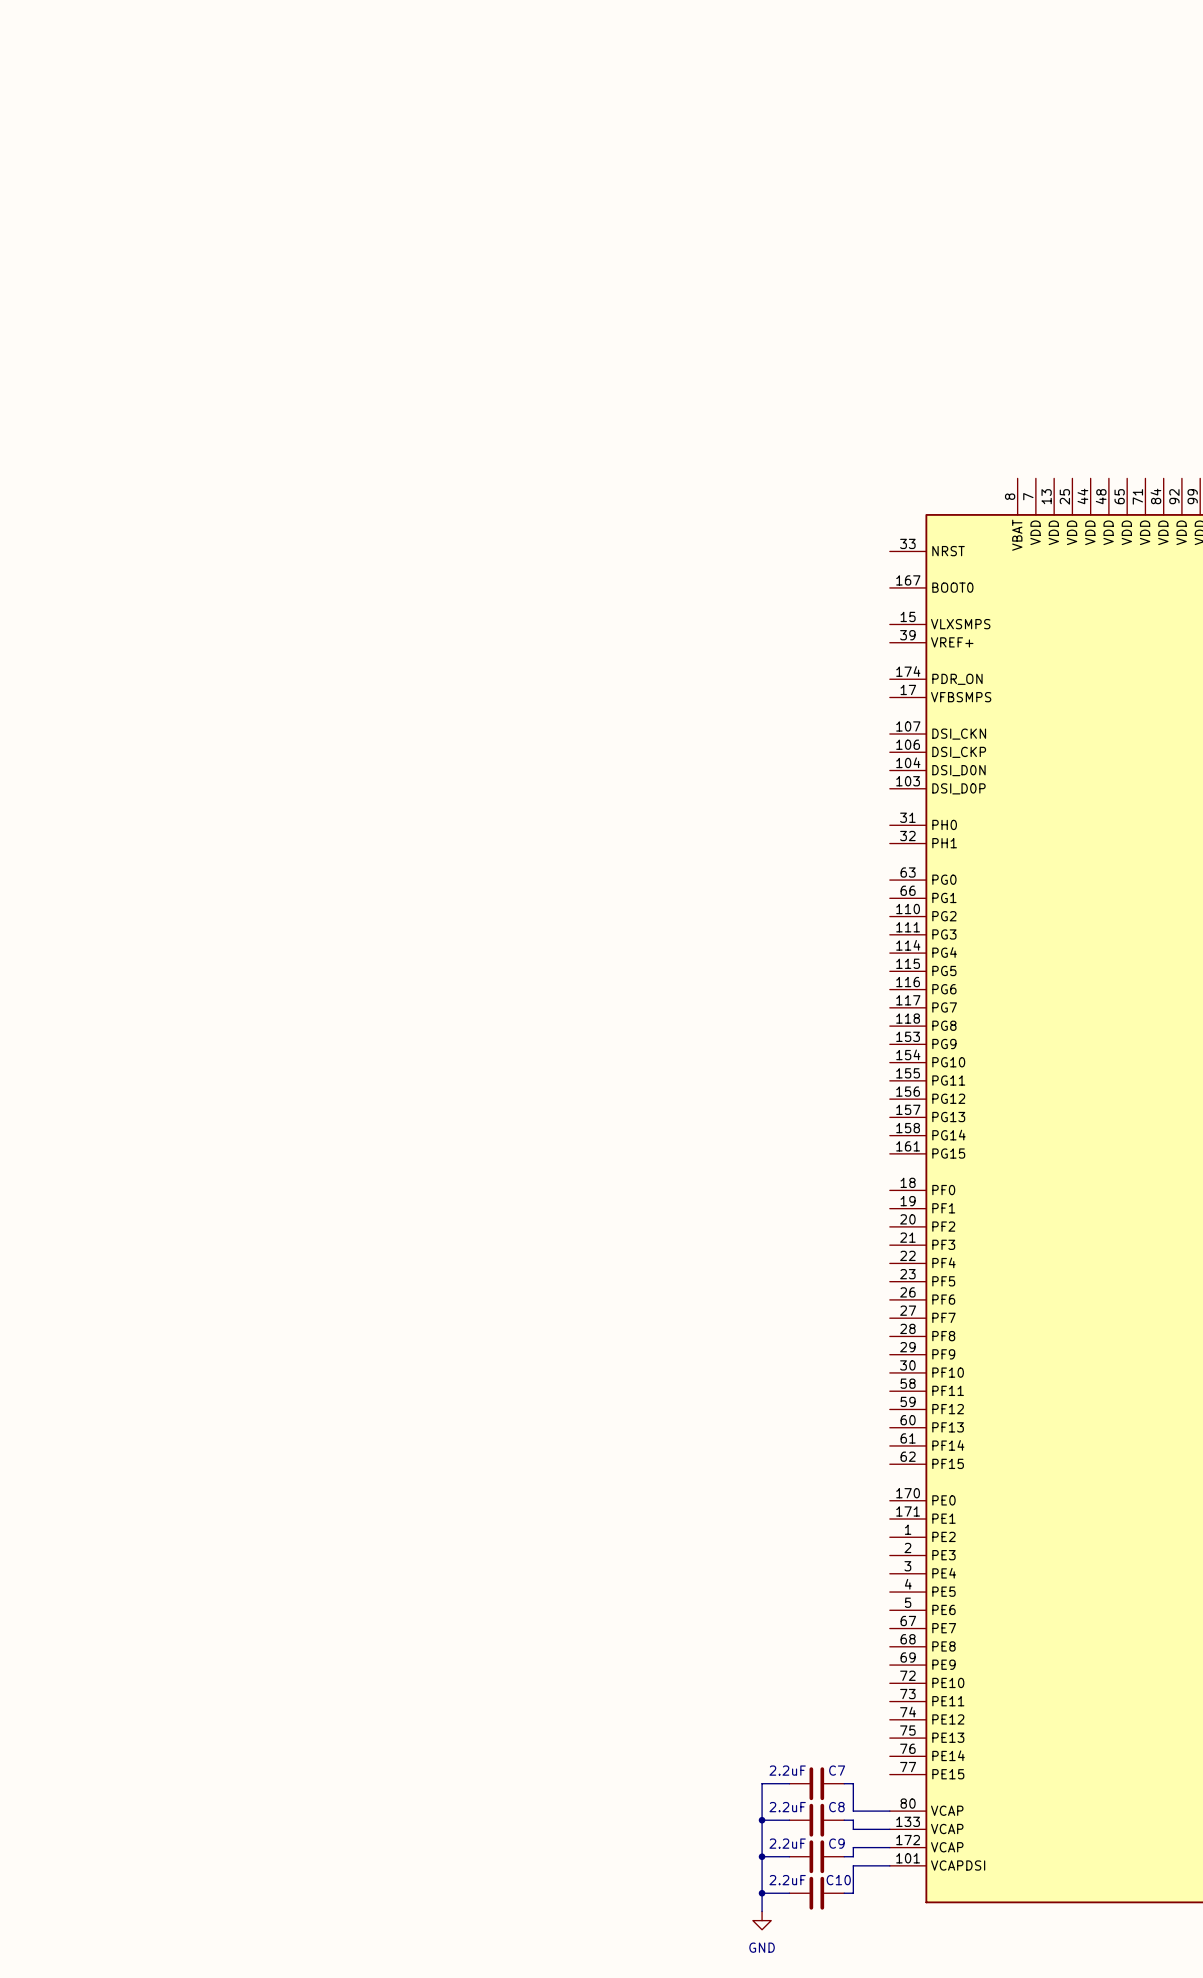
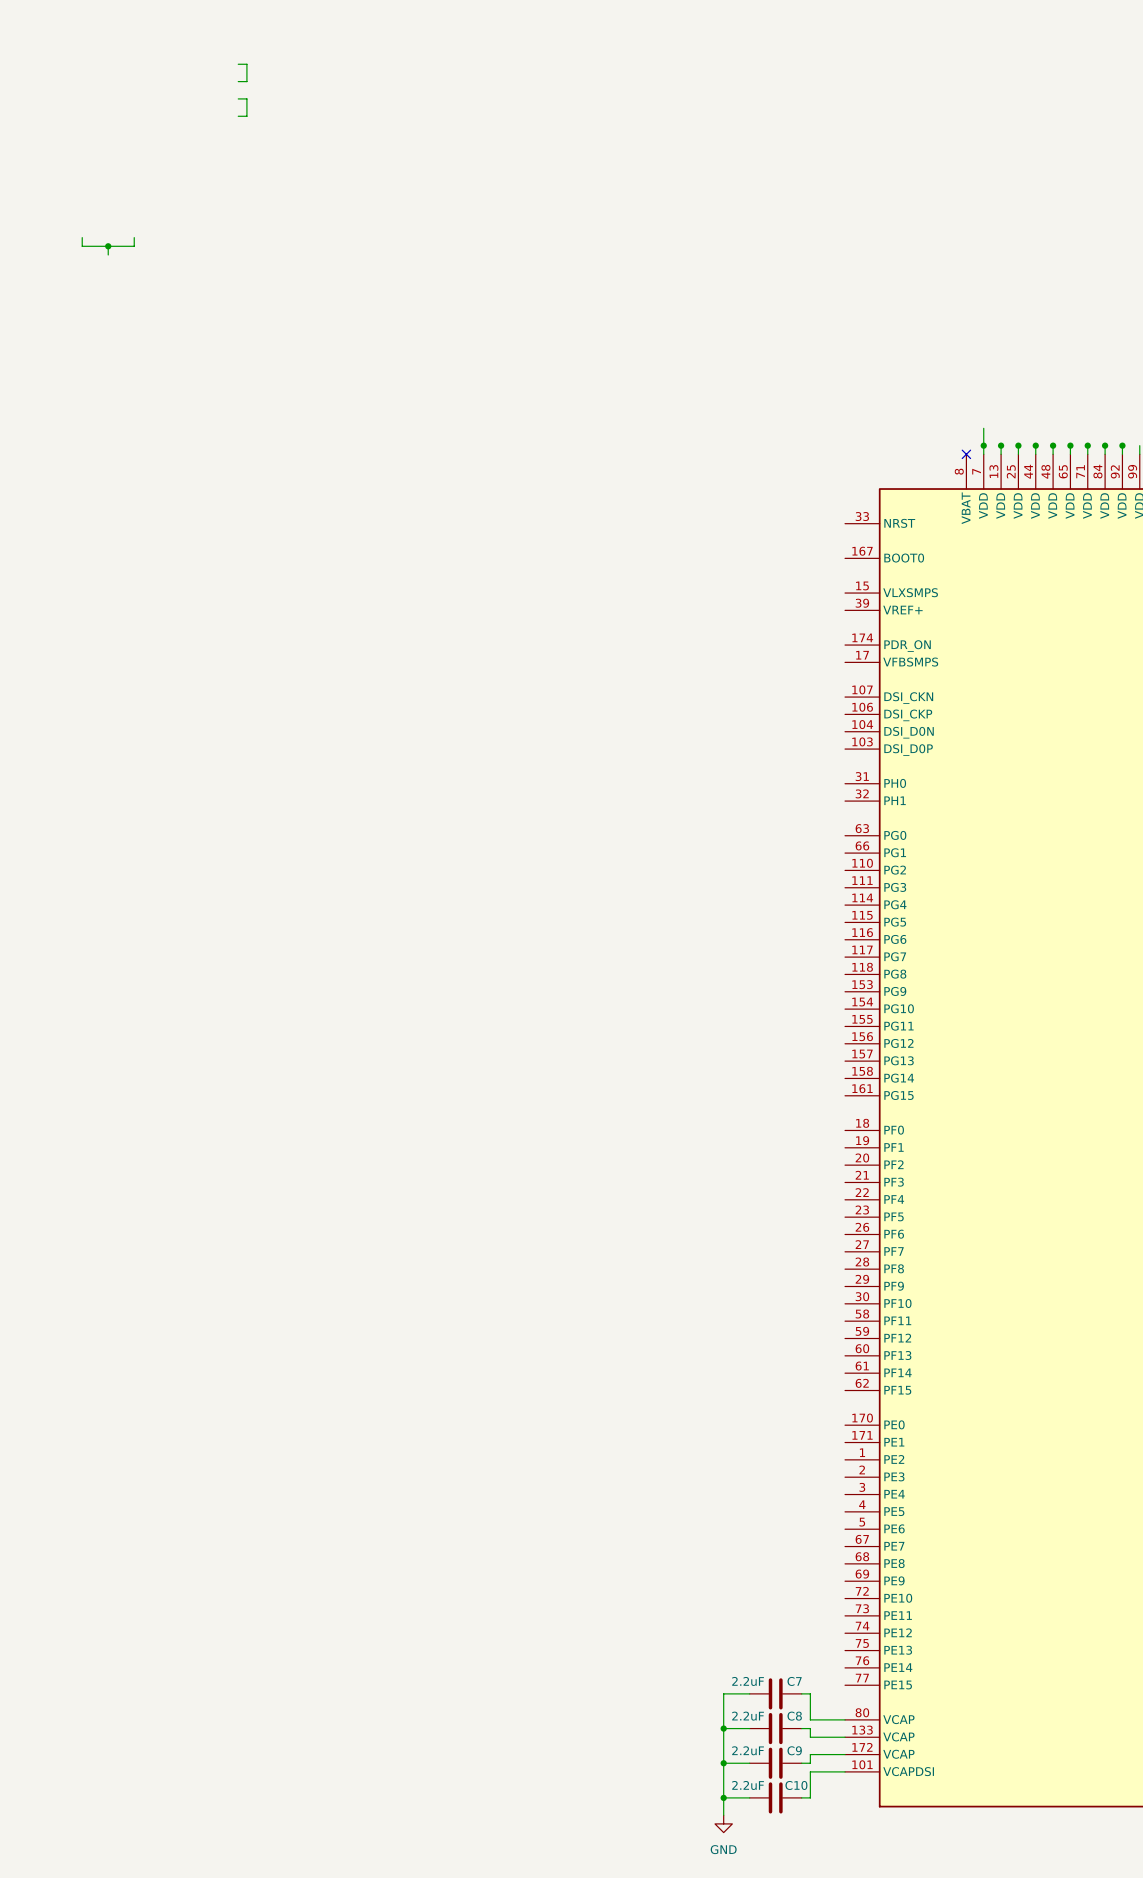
wire: none -> (238, 64) (246, 64) (246, 81) (238, 81)
wire: none -> (238, 98) (246, 98) (246, 116) (238, 116)
wire: none -> (82, 237) (82, 246) (134, 246) (134, 237)
wire: none -> (108, 246) (108, 254)
junction: none -> (108, 246)
wire: none -> (983, 428) (983, 454)
junction: none -> (983, 445)
wire: none -> (1001, 445) (1001, 454)
junction: none -> (1001, 445)
wire: none -> (1018, 445) (1018, 454)
junction: none -> (1018, 445)
wire: none -> (1035, 445) (1035, 454)
junction: none -> (1035, 445)
wire: none -> (1053, 445) (1053, 454)
junction: none -> (1053, 445)
wire: none -> (1070, 445) (1070, 454)
junction: none -> (1070, 445)
wire: none -> (1087, 445) (1087, 454)
junction: none -> (1087, 445)
wire: none -> (1105, 445) (1105, 454)
junction: none -> (1105, 445)
wire: none -> (1122, 445) (1122, 454)
junction: none -> (1122, 445)
wire: none -> (1139, 445) (1139, 454)
no-connect mark: none -> (966, 454)

